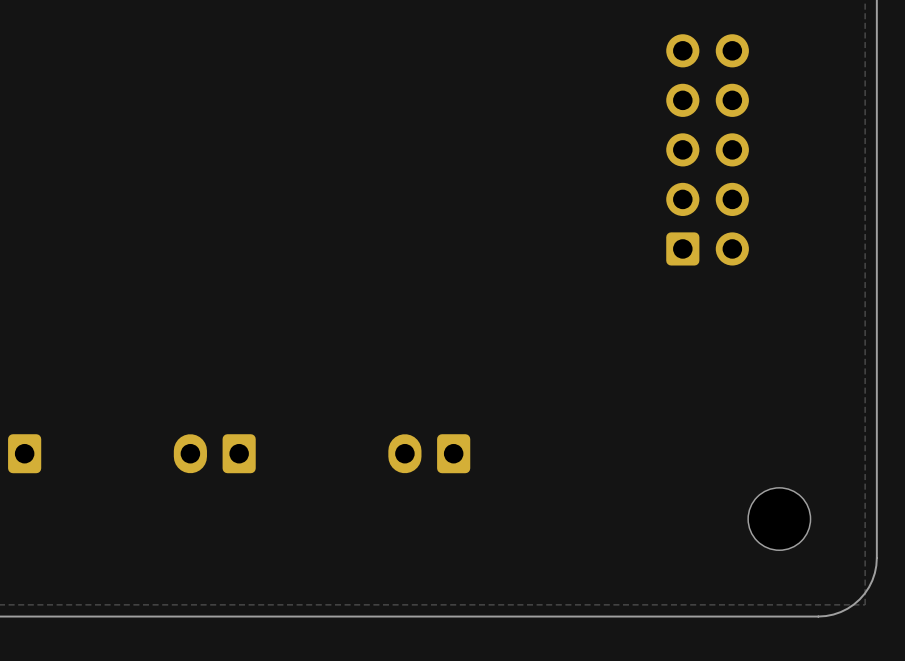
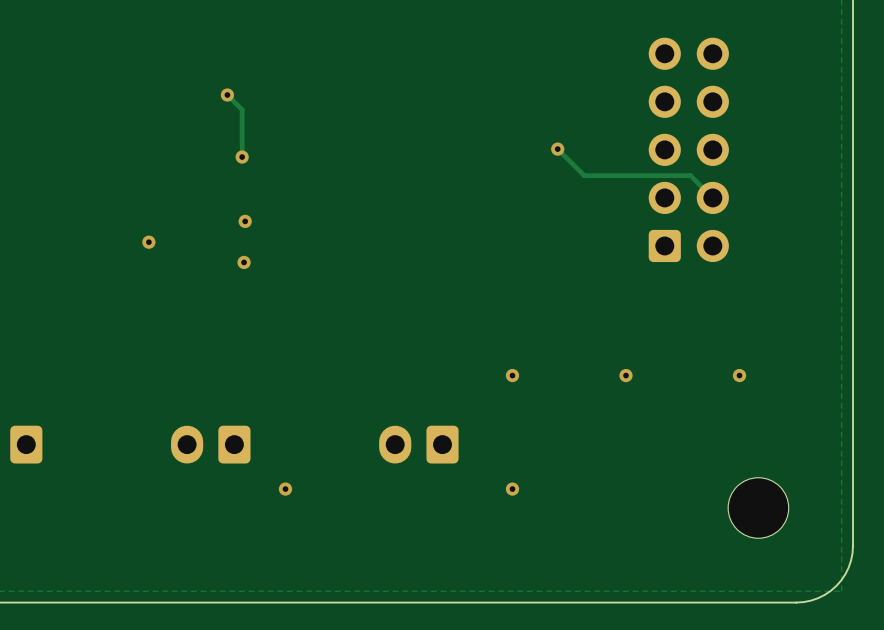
track: none -> (227, 95) (242, 109) (242, 157)
via: none -> (227, 95)
track: none -> (557, 149) (584, 175) (690, 175) (712, 197)
via: none -> (557, 149)
via: none -> (242, 157)
via: none -> (245, 221)
via: none -> (148, 242)
via: none -> (244, 262)
via: none -> (512, 375)
via: none -> (626, 375)
via: none -> (739, 375)
via: none -> (285, 489)
via: none -> (512, 489)

